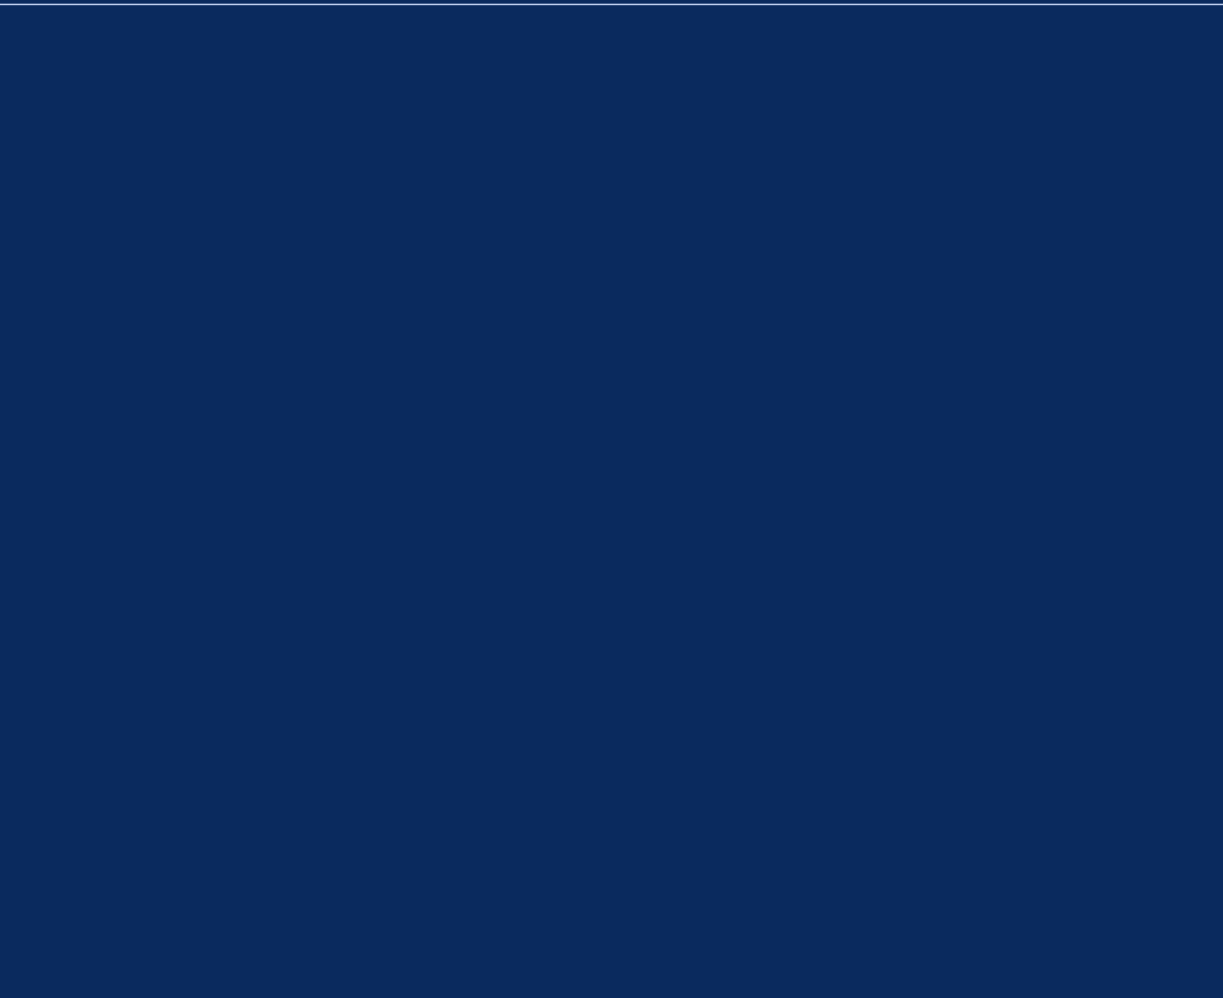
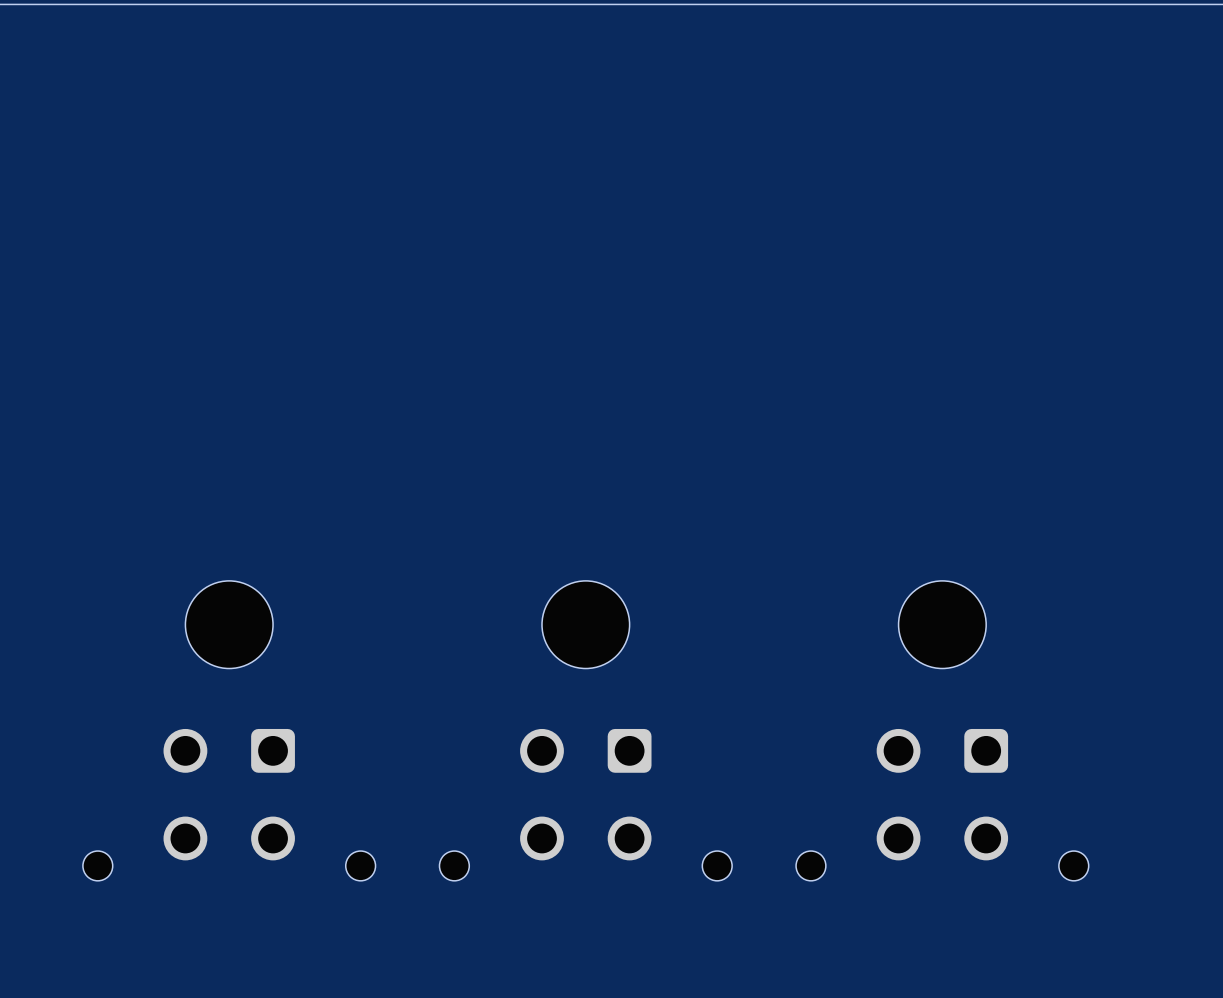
part: none -> (229, 730)
part: none -> (585, 730)
part: none -> (942, 730)

